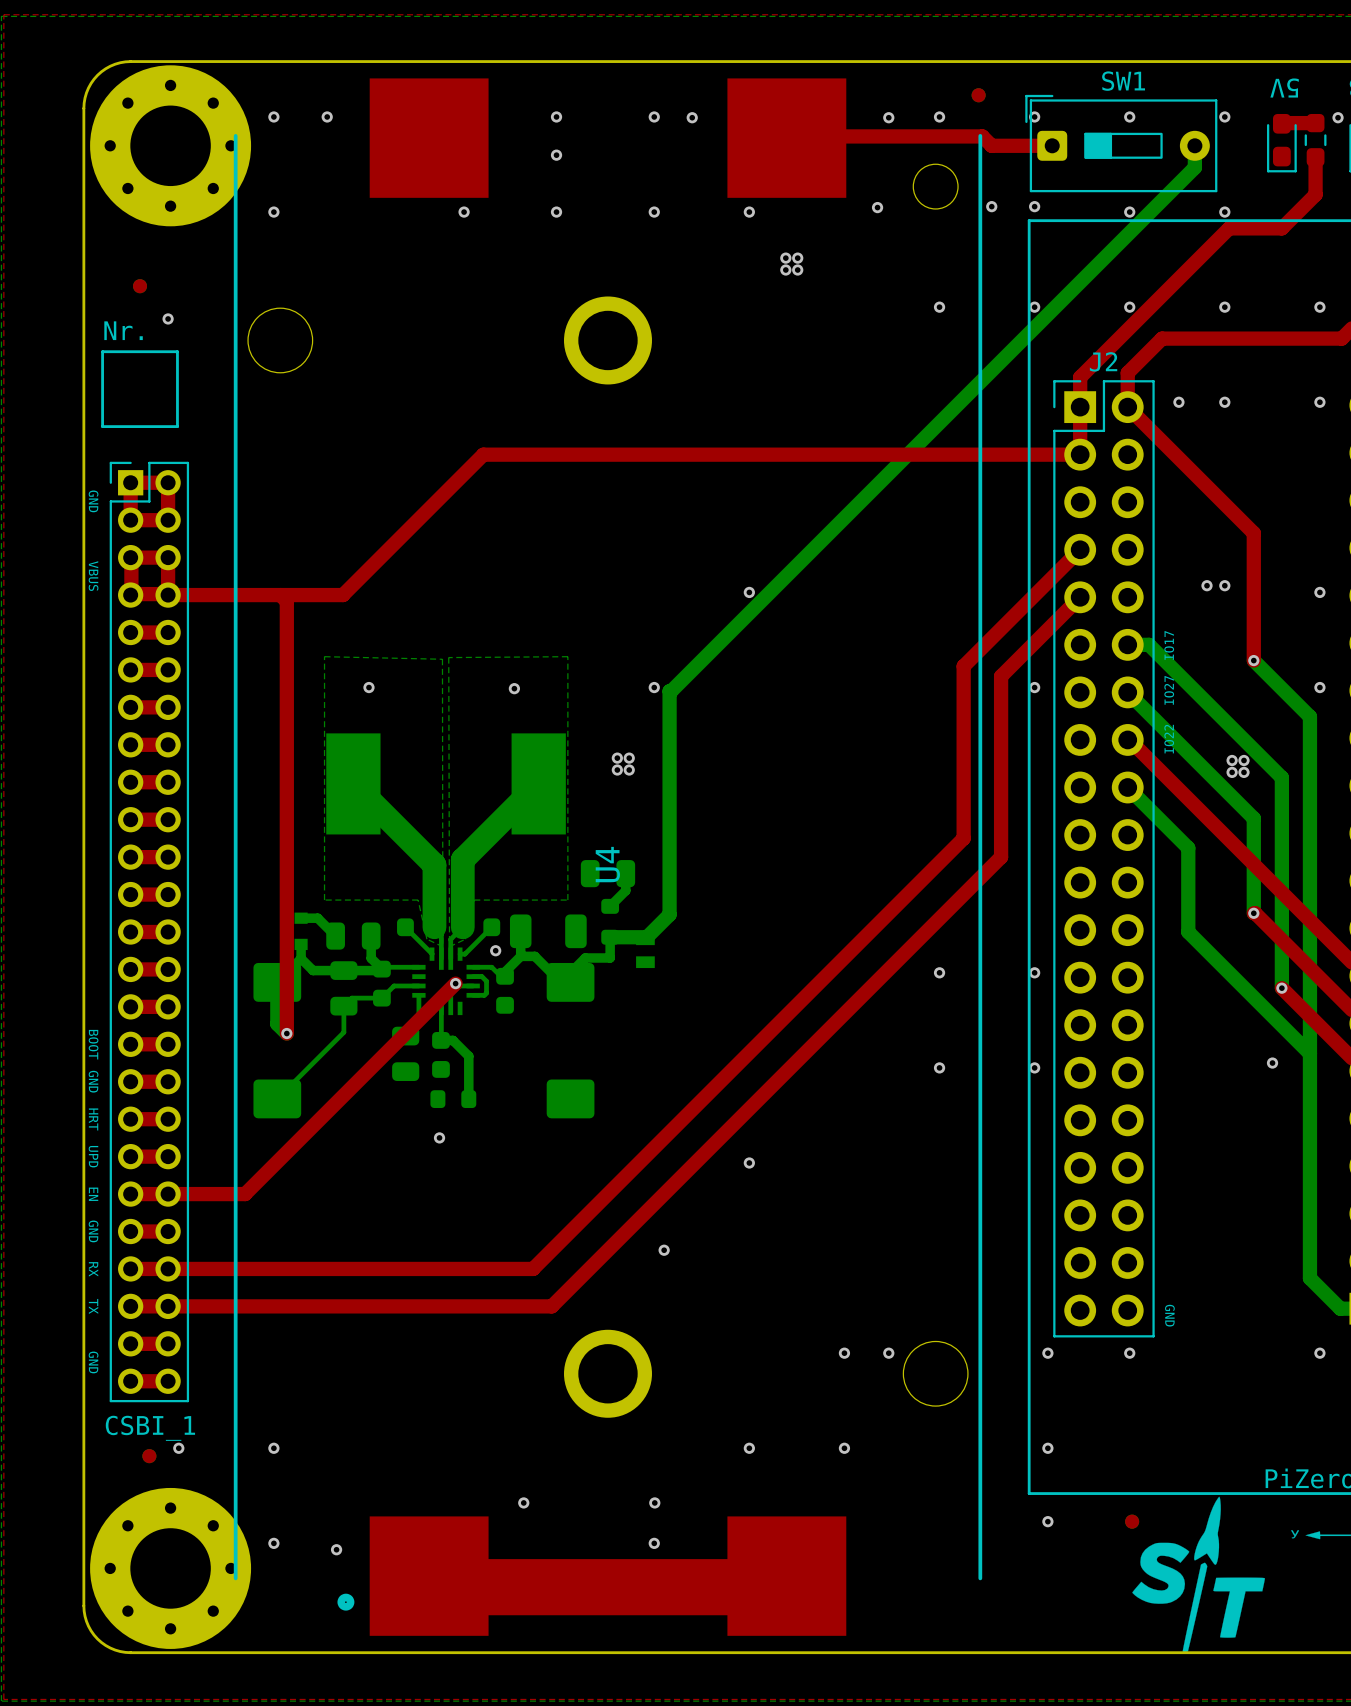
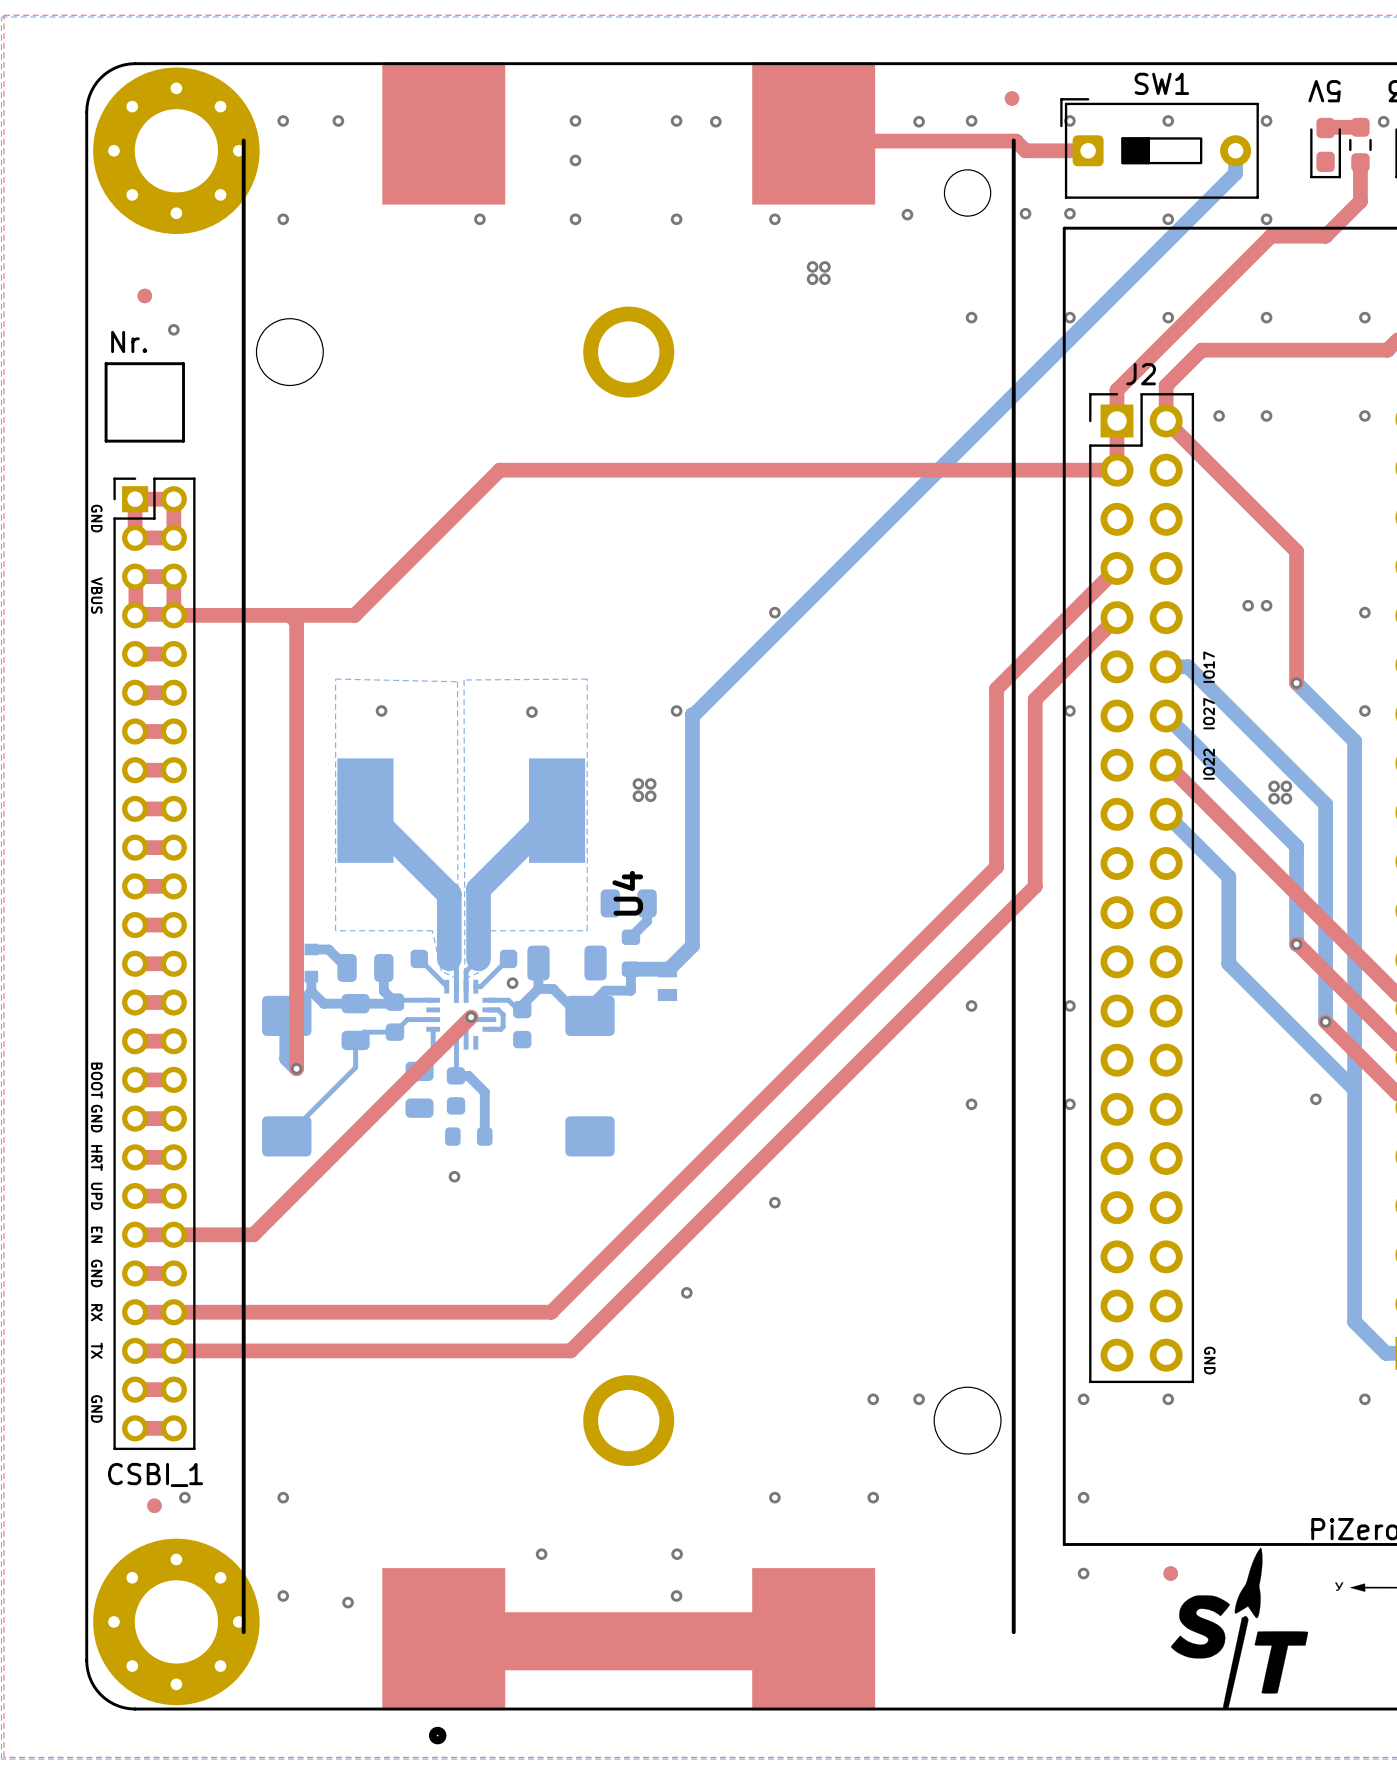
U4 footprint: [233, 78, 983, 1636] -> [241, 62, 1016, 1745]

